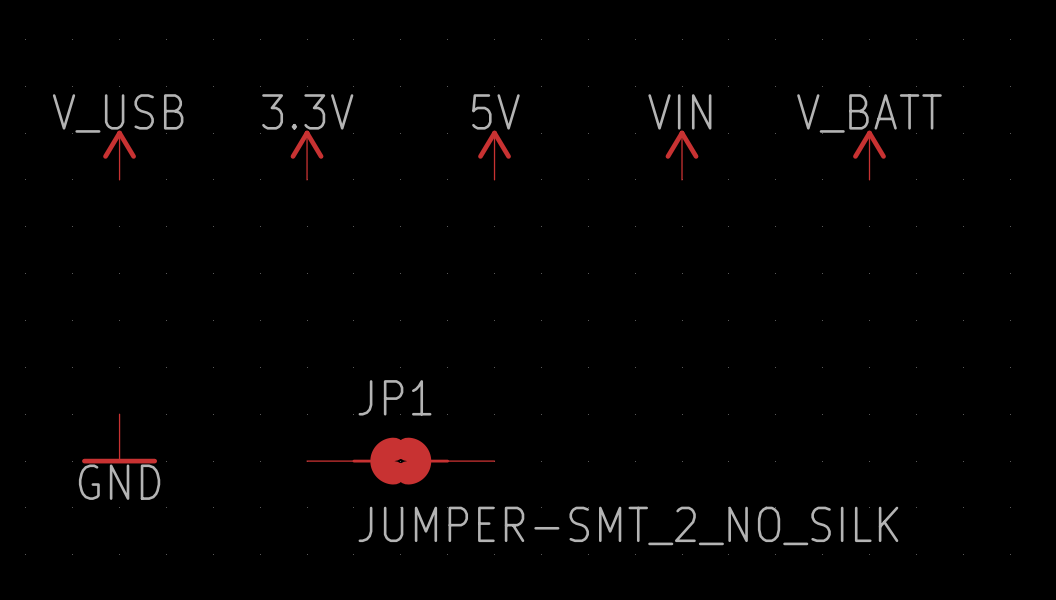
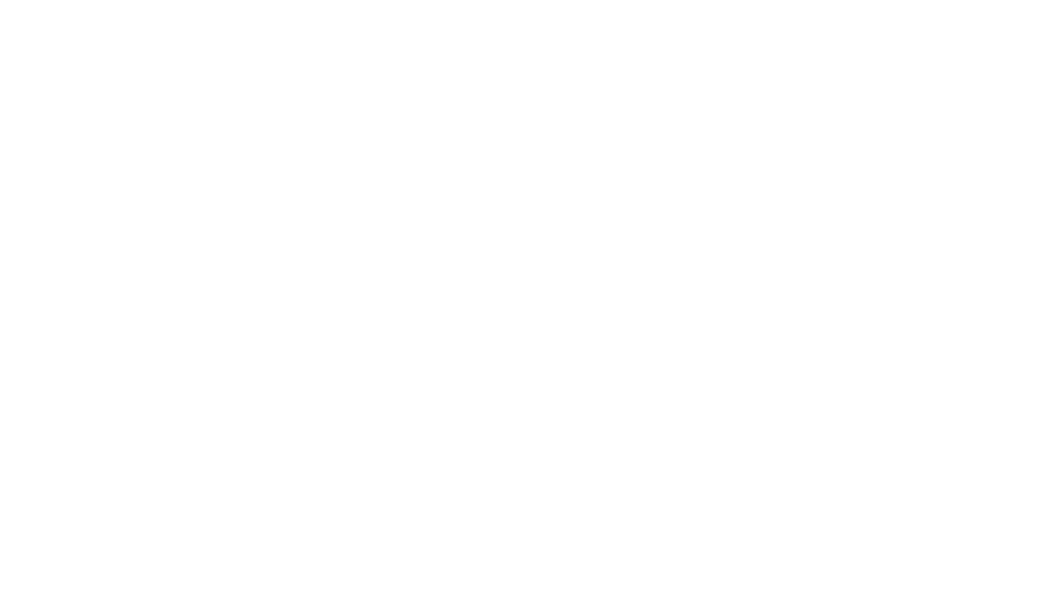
power symbol: V_USB (119, 155) -> none
power symbol: 3.3V (307, 155) -> none
power symbol: 5V (494, 155) -> none
power symbol: VIN (682, 155) -> none
power symbol: V_BATT (869, 155) -> none
power symbol: GND (119, 438) -> none
JP1: JUMPER-SMT_2_NO_SILK (400, 461) -> none

